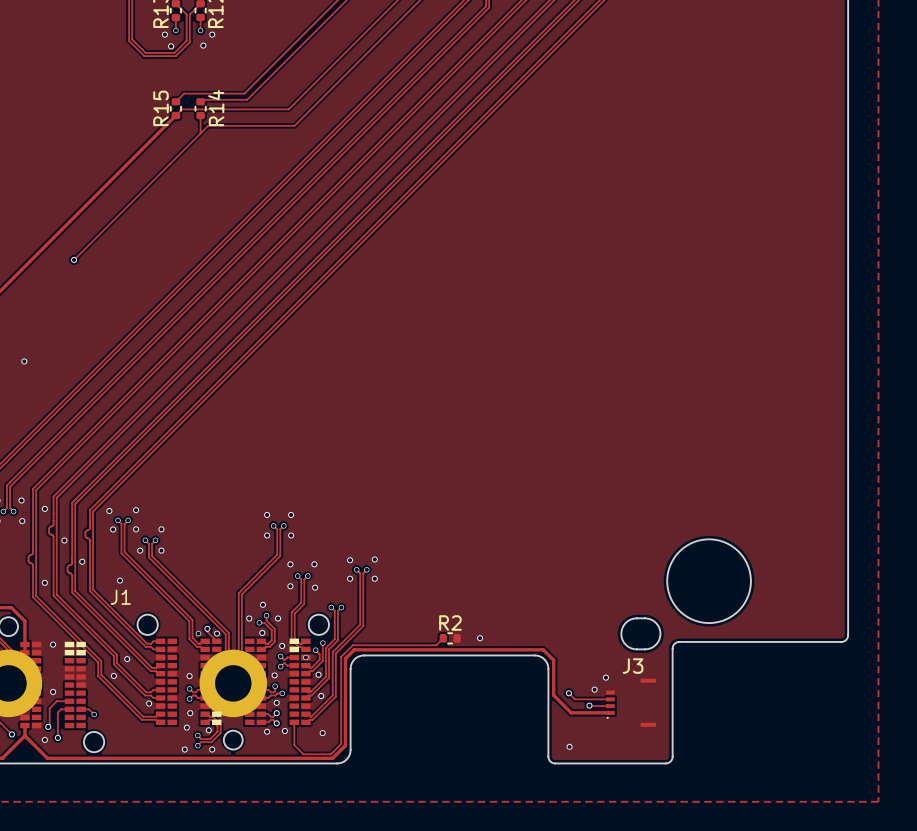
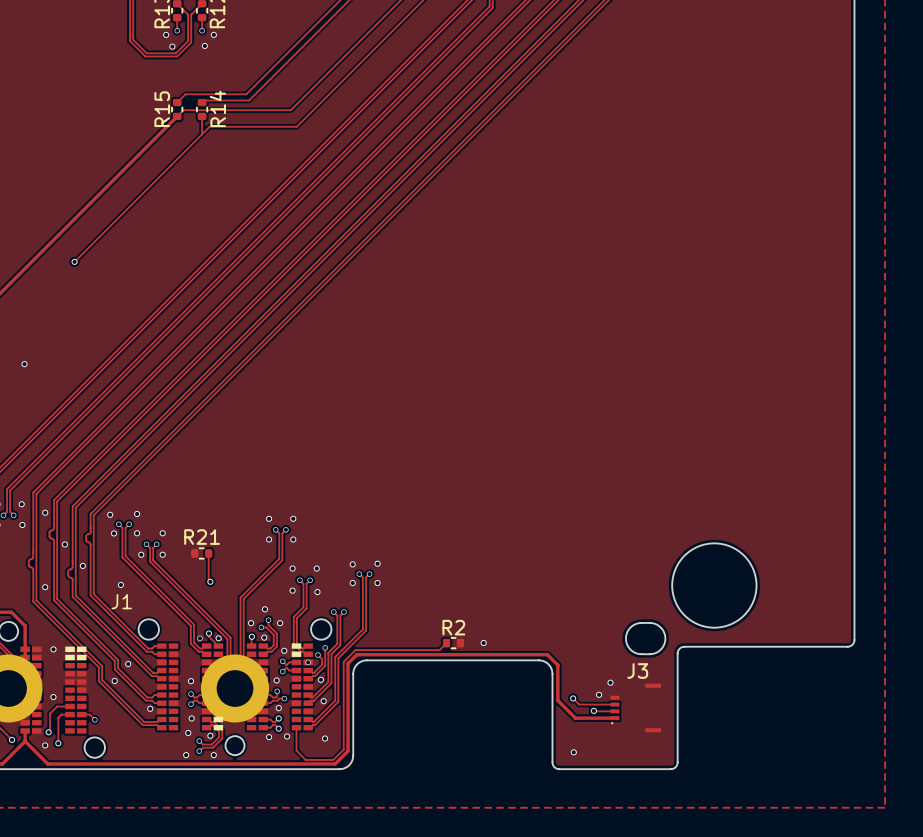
R21: none -> (201, 553)
track: none -> (208, 553) (208, 580) (210, 581)
via: none -> (210, 581)
track: none -> (251, 636) (251, 646)
via: none -> (251, 636)

